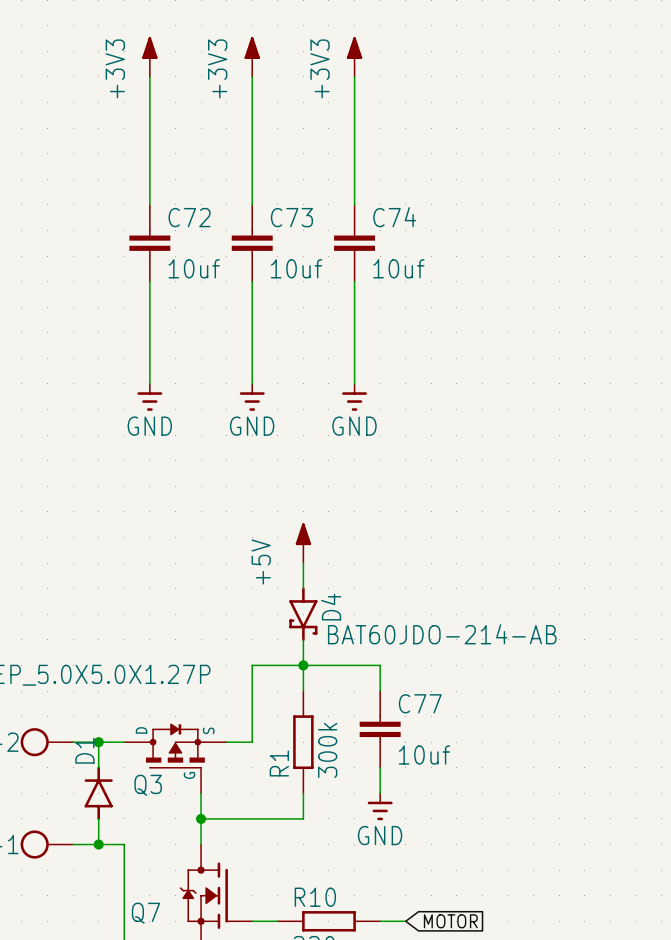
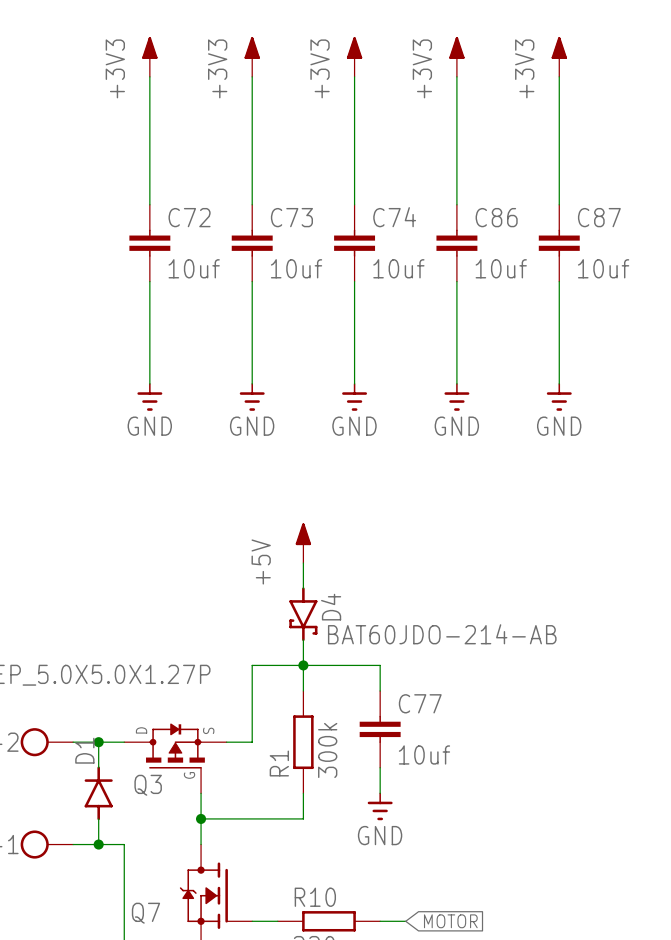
power symbol: none -> +3V3 (456, 57)
power symbol: none -> +3V3 (559, 57)
wire: none -> (456, 76) (456, 204)
wire: none -> (559, 76) (559, 204)
C86: none -> 10uf (456, 243)
C87: none -> 10uf (559, 243)
wire: none -> (456, 281) (456, 383)
wire: none -> (559, 281) (559, 383)
power symbol: none -> GND (456, 396)
power symbol: none -> GND (559, 396)

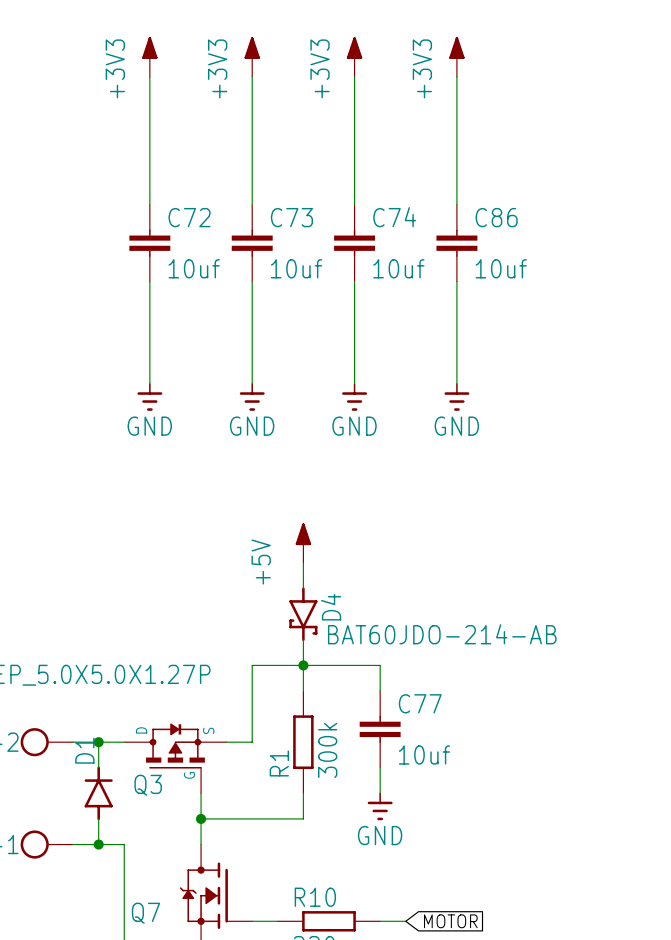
power symbol: +3V3 (559, 57) -> none
wire: (559, 76) (559, 204) -> none
C87: 10uf (559, 243) -> none
wire: (559, 281) (559, 383) -> none
power symbol: GND (559, 396) -> none

